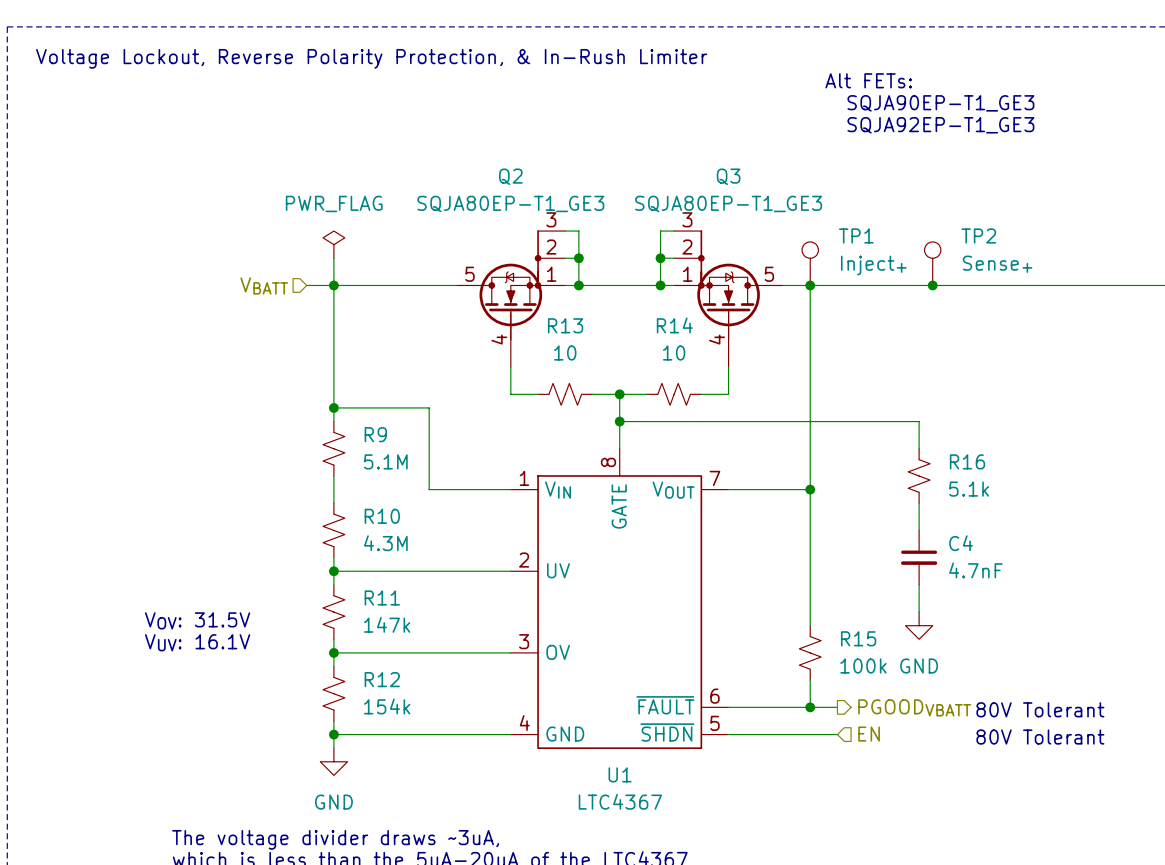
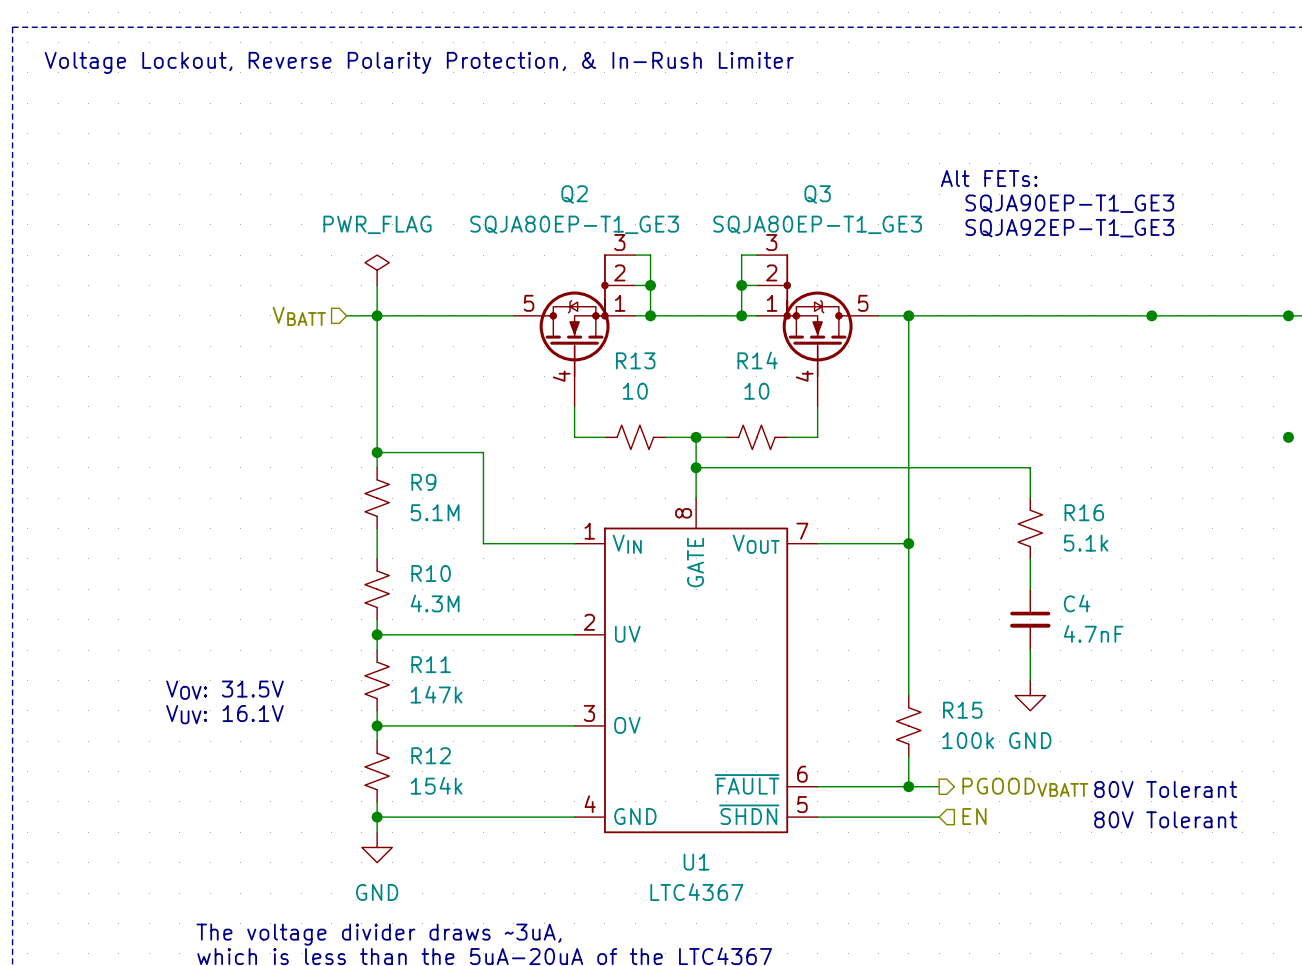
text position: Alt FETs: (868, 80) -> Alt FETs: (989, 178)
text position: SQJA90EP-T1_GE3 (940, 103) -> SQJA90EP-T1_GE3 (1069, 203)
text position: SQJA92EP-T1_GE3 (940, 125) -> SQJA92EP-T1_GE3 (1069, 228)
TP1: Inject+ (810, 263) -> none
TP2: Sense+ (932, 263) -> none
junction: (932, 285) -> none
junction: none -> (1151, 315)
junction: none -> (1288, 315)
junction: none -> (1288, 437)

